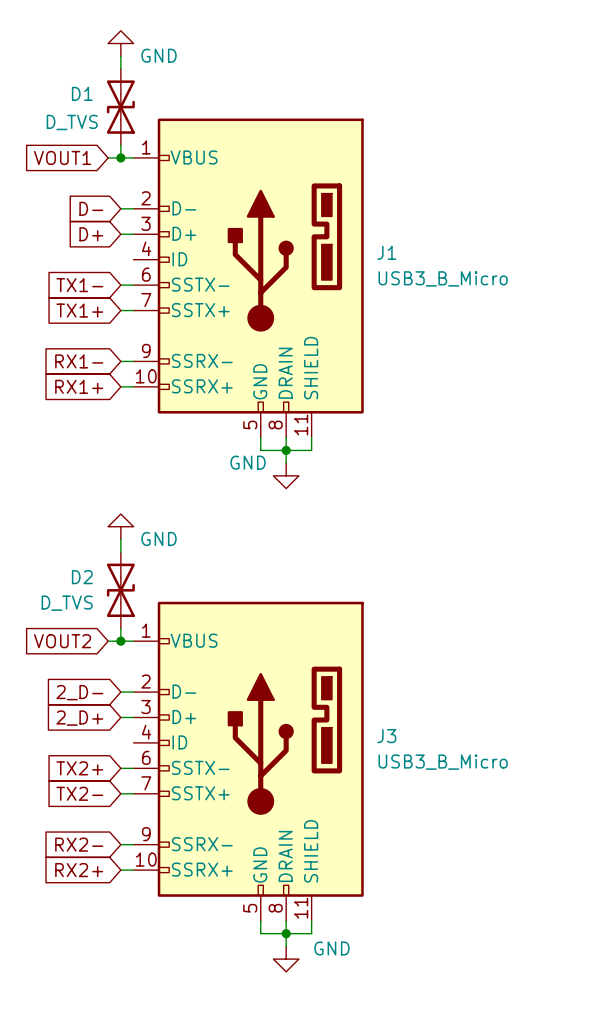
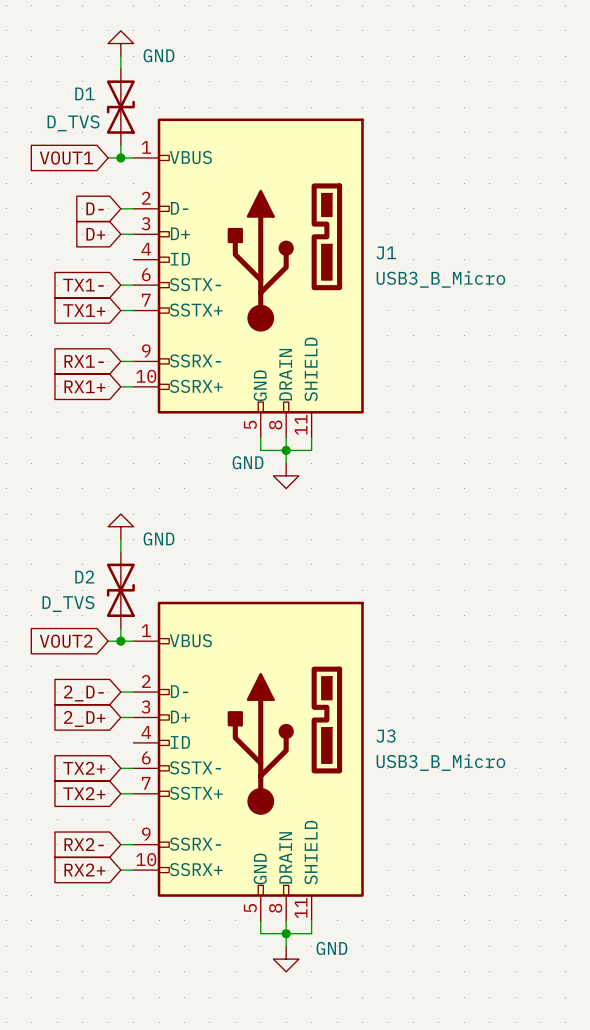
global label: TX2- (79, 793) -> TX2+ (84, 793)

